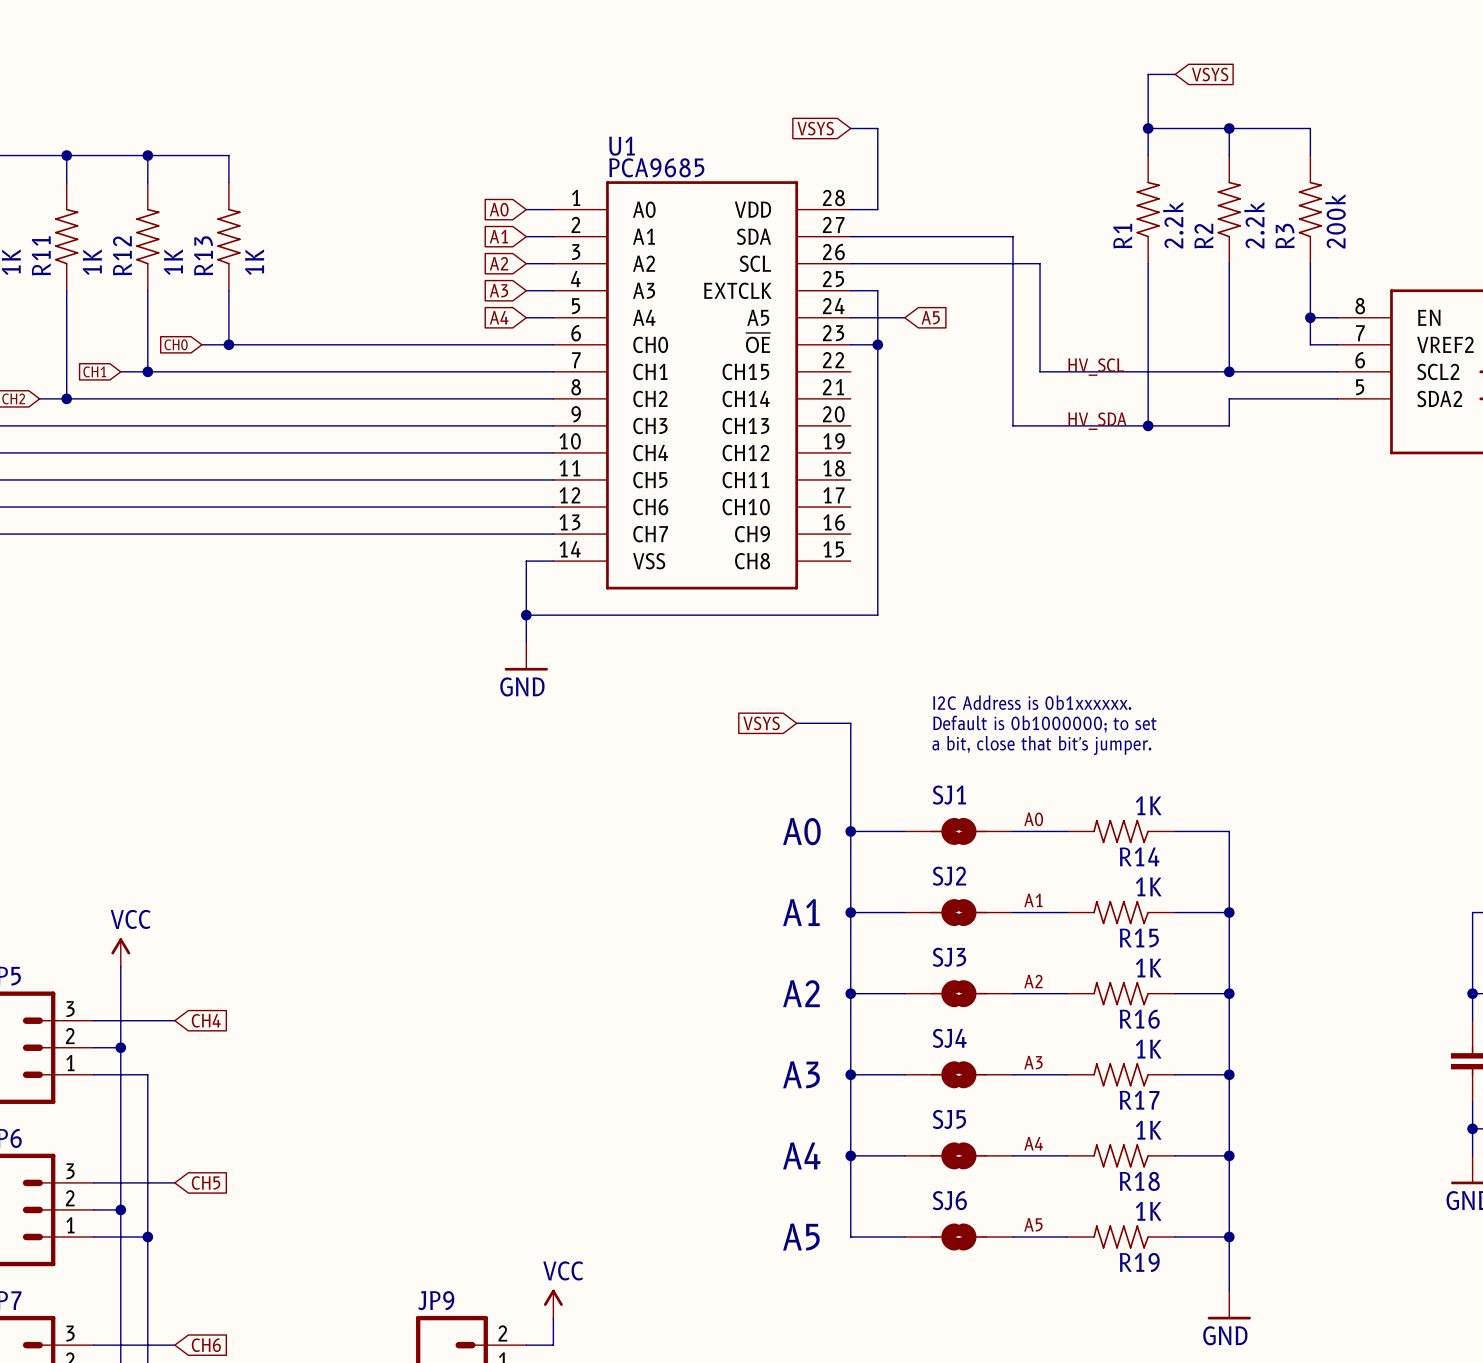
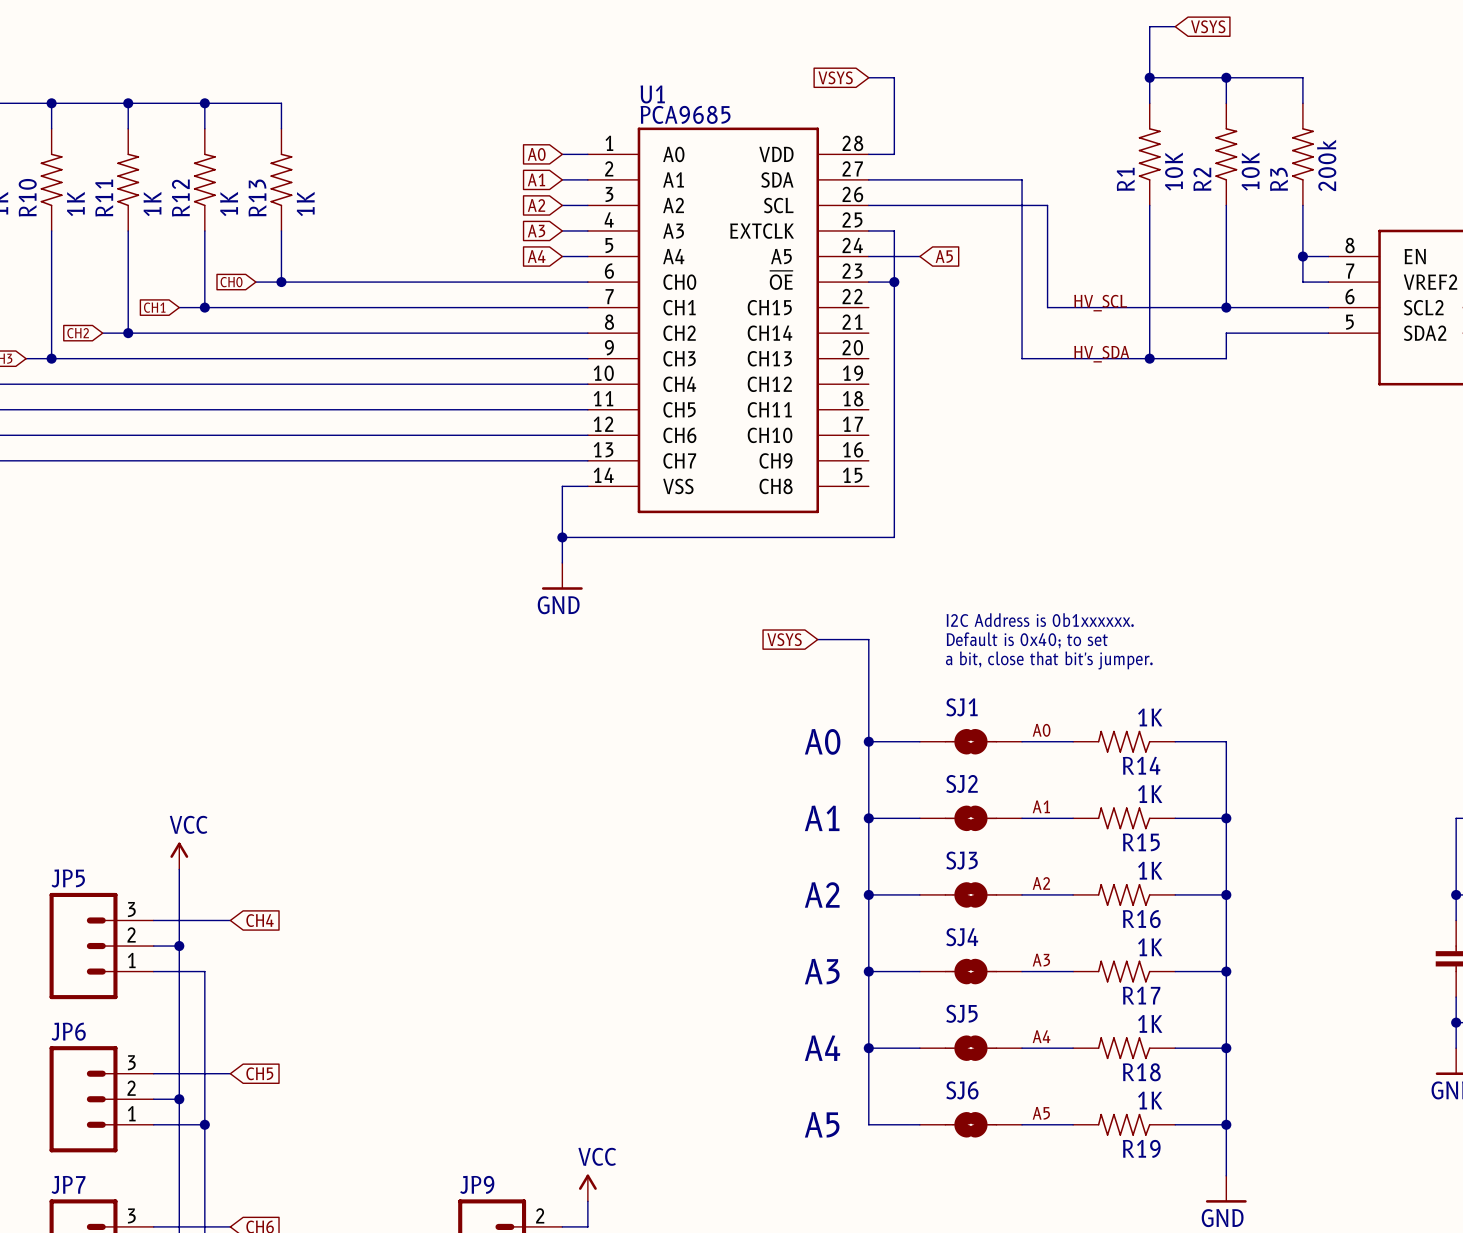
R1 value: 2.2k (1173, 225) -> 10K (1174, 171)
R2 value: 2.2k (1254, 225) -> 10K (1250, 171)
text: Default is 0b1000000; to set (1044, 724) -> Default is 0x40; to set (1027, 640)

